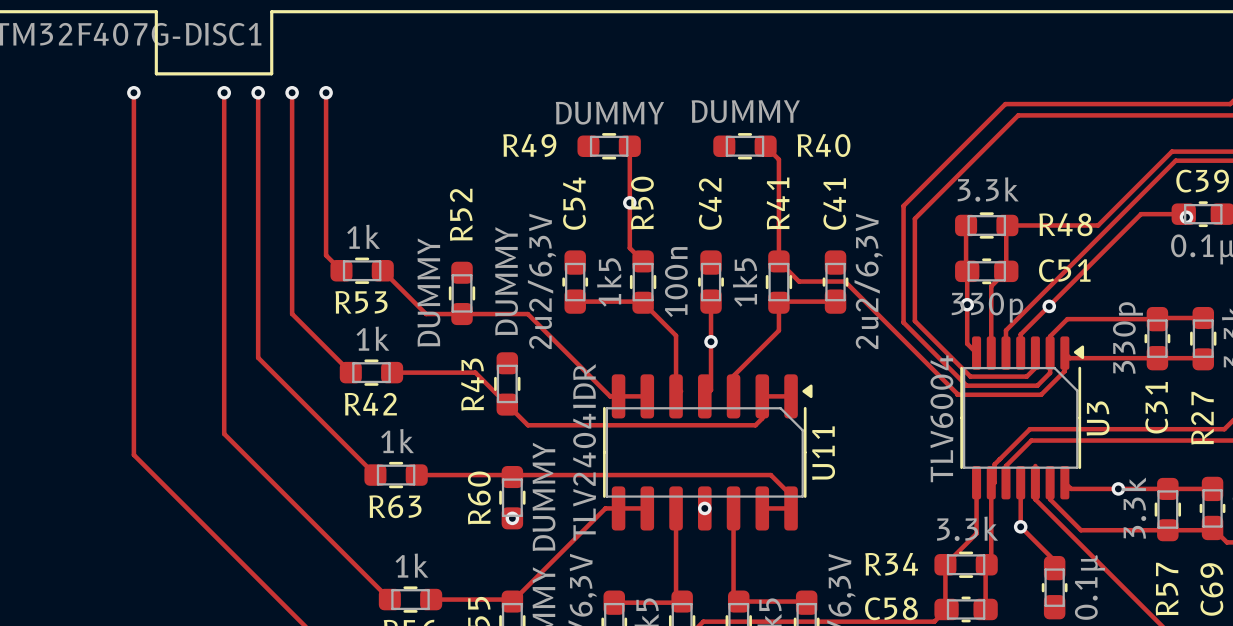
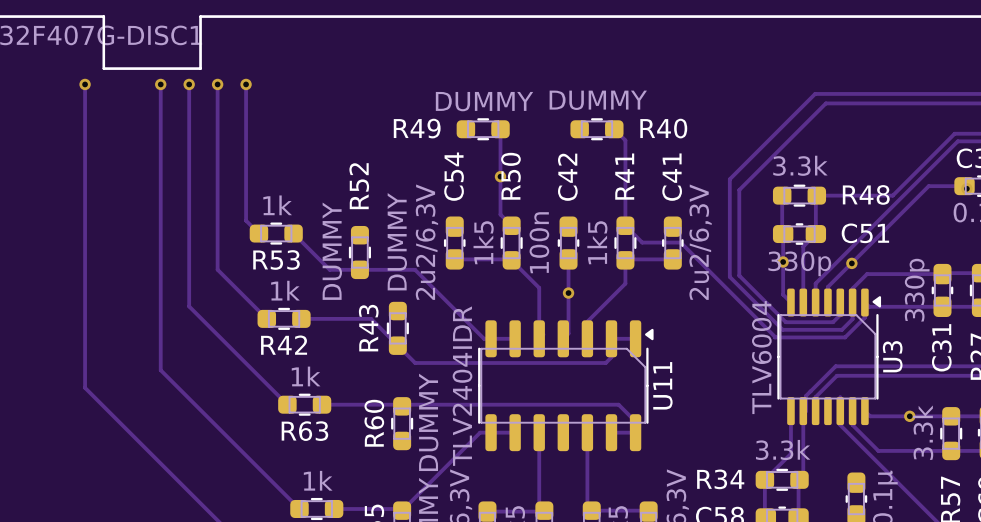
track: (1020, 482) (1020, 526) (1054, 560) (1054, 568) -> none
via: (704, 508) -> none
via: (512, 518) -> none
via: (1020, 526) -> none

